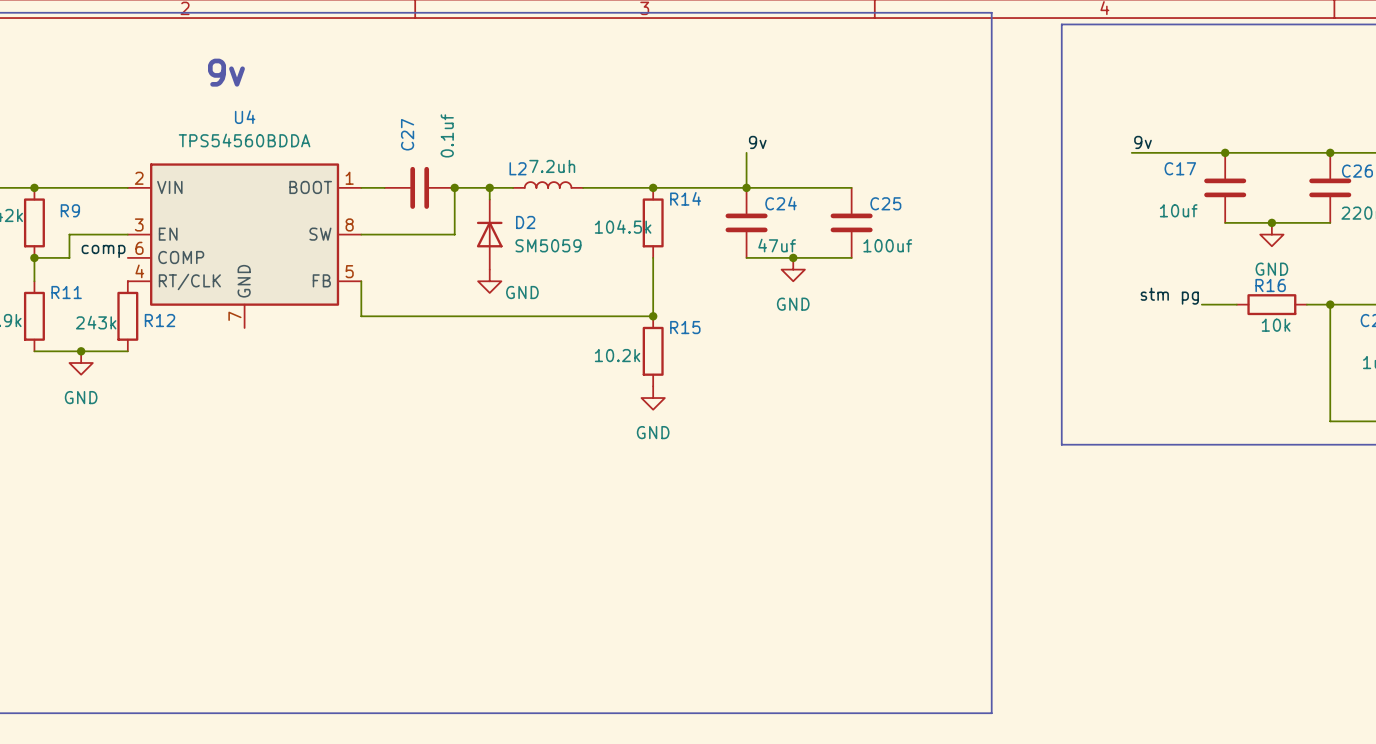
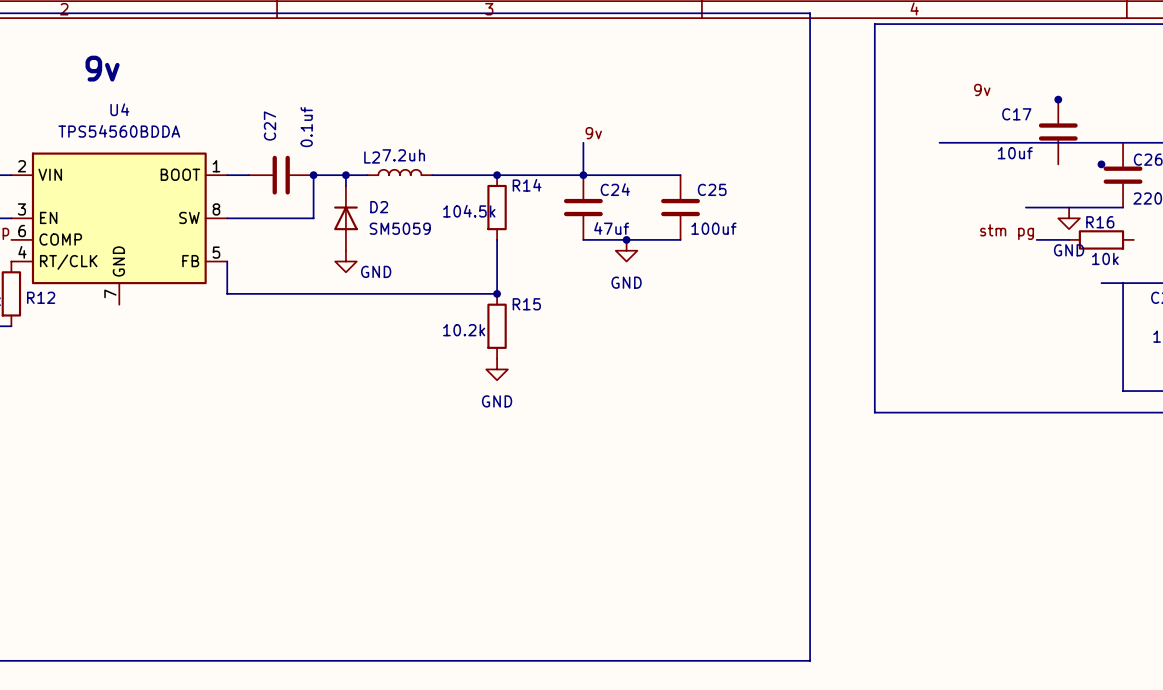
junction: none -> (1058, 99)
label position: 9v (1143, 142) -> 9v (982, 89)
junction: (1225, 152) -> none
junction: (1330, 152) -> none
junction: none -> (1101, 164)
C17 position: (1225, 187) -> (1058, 132)
junction: (1271, 222) -> none
label position: stm pg (1169, 296) -> stm pg (1007, 232)
wire: (1201, 304) (1236, 304) -> (1036, 239) (1069, 239)
R16 position: (1271, 304) -> (1101, 239)
junction: (1330, 304) -> none

